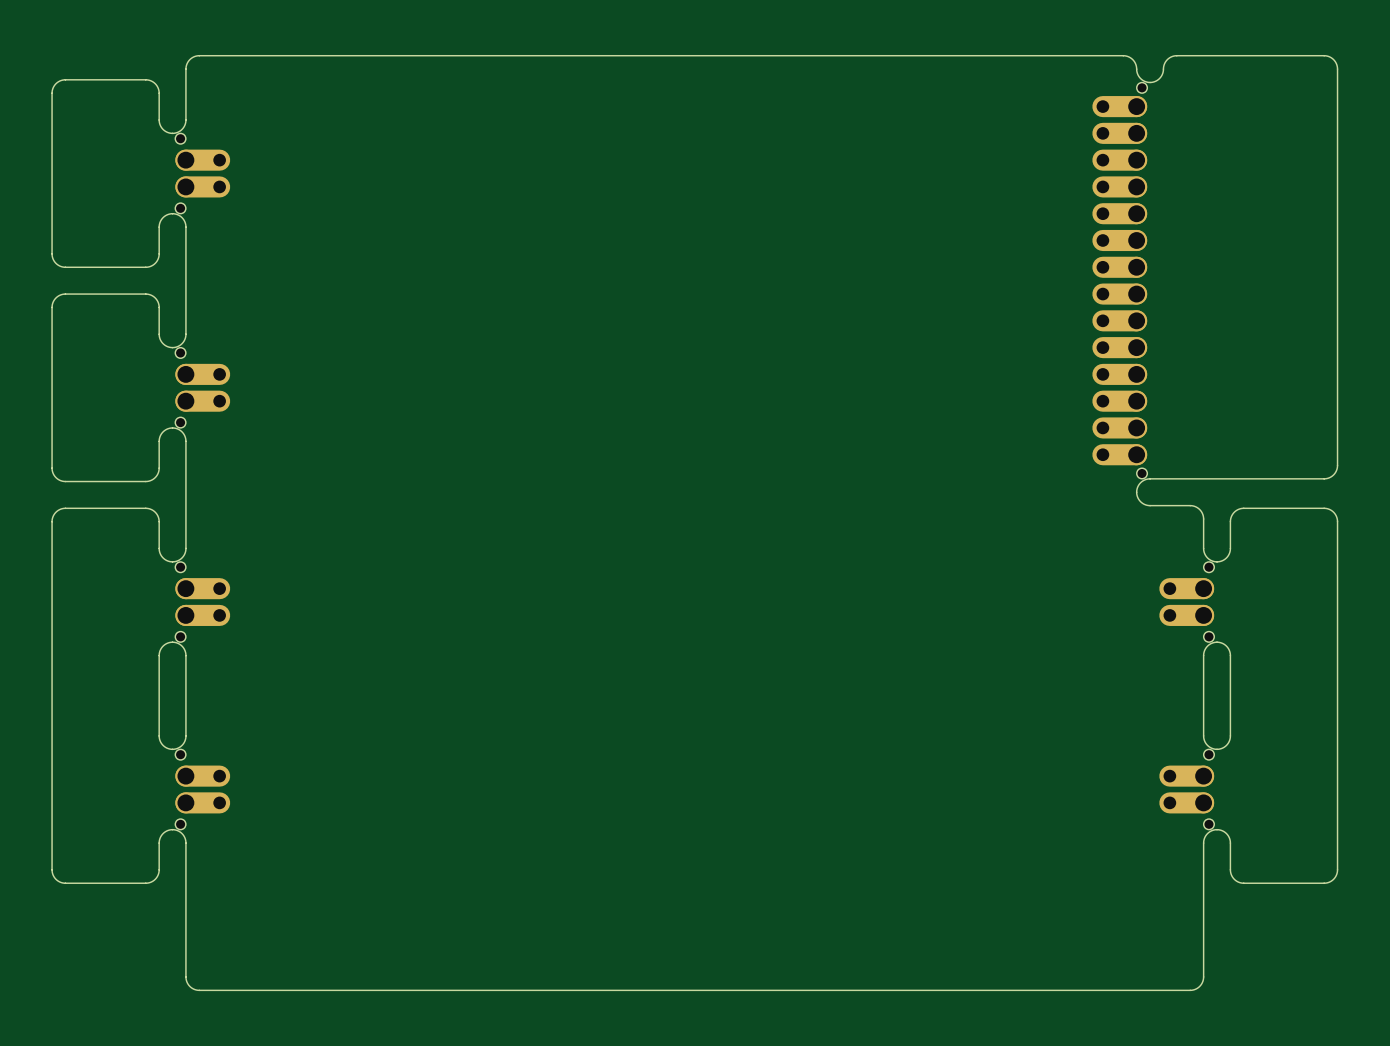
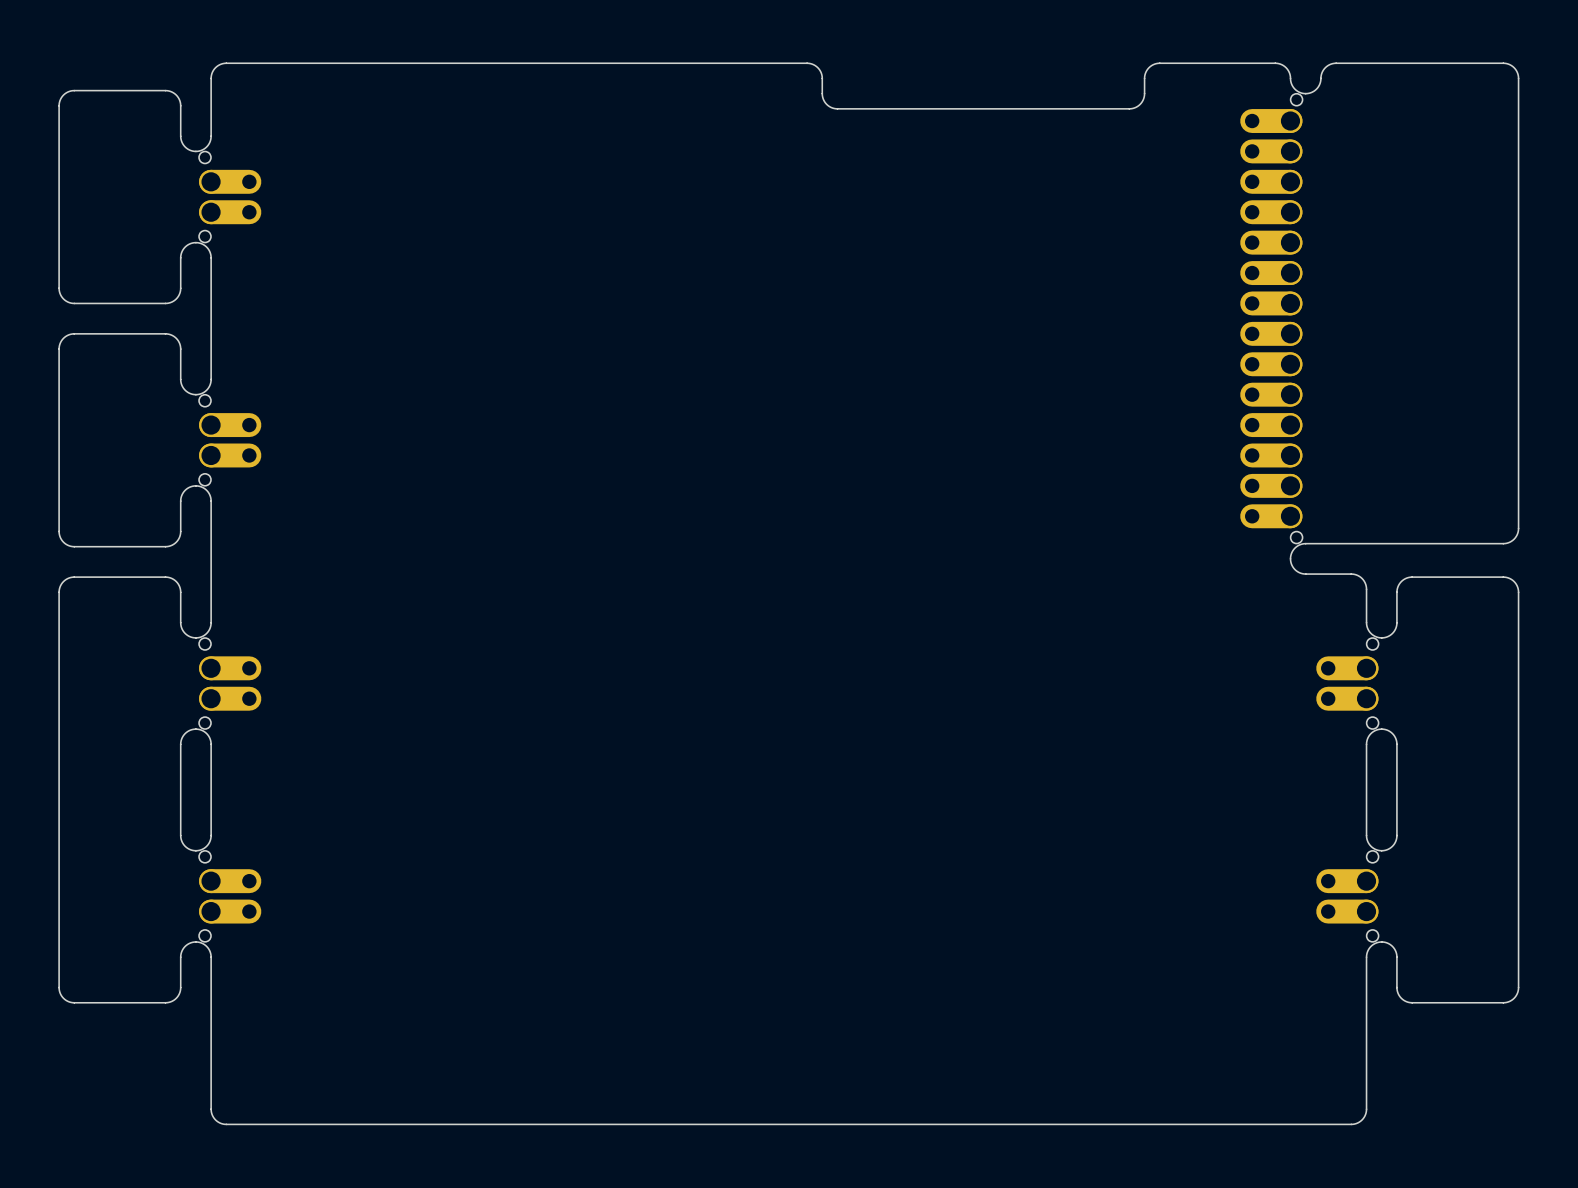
board edge: (1021, 55) (710, 55) -> (1159, 63) (1151, 65) (1146, 71) (1142, 101) (1135, 107) (1129, 108) (835, 108) (827, 105) (823, 98) (822, 76) (819, 70) (813, 64) (807, 63)

